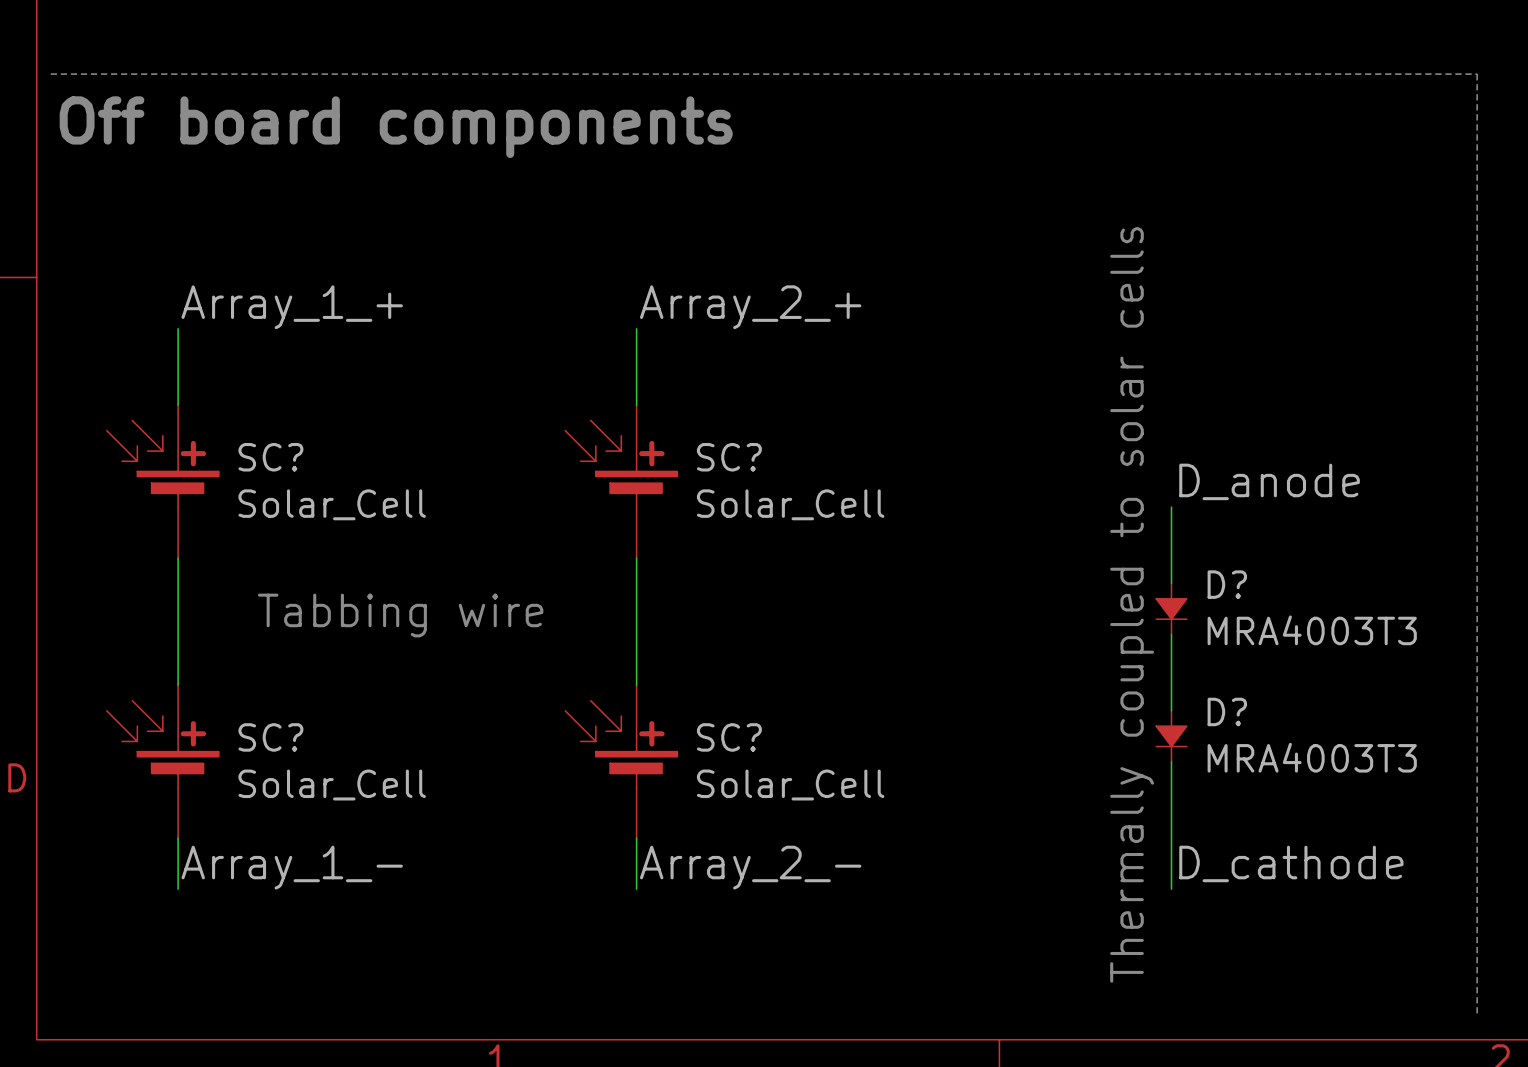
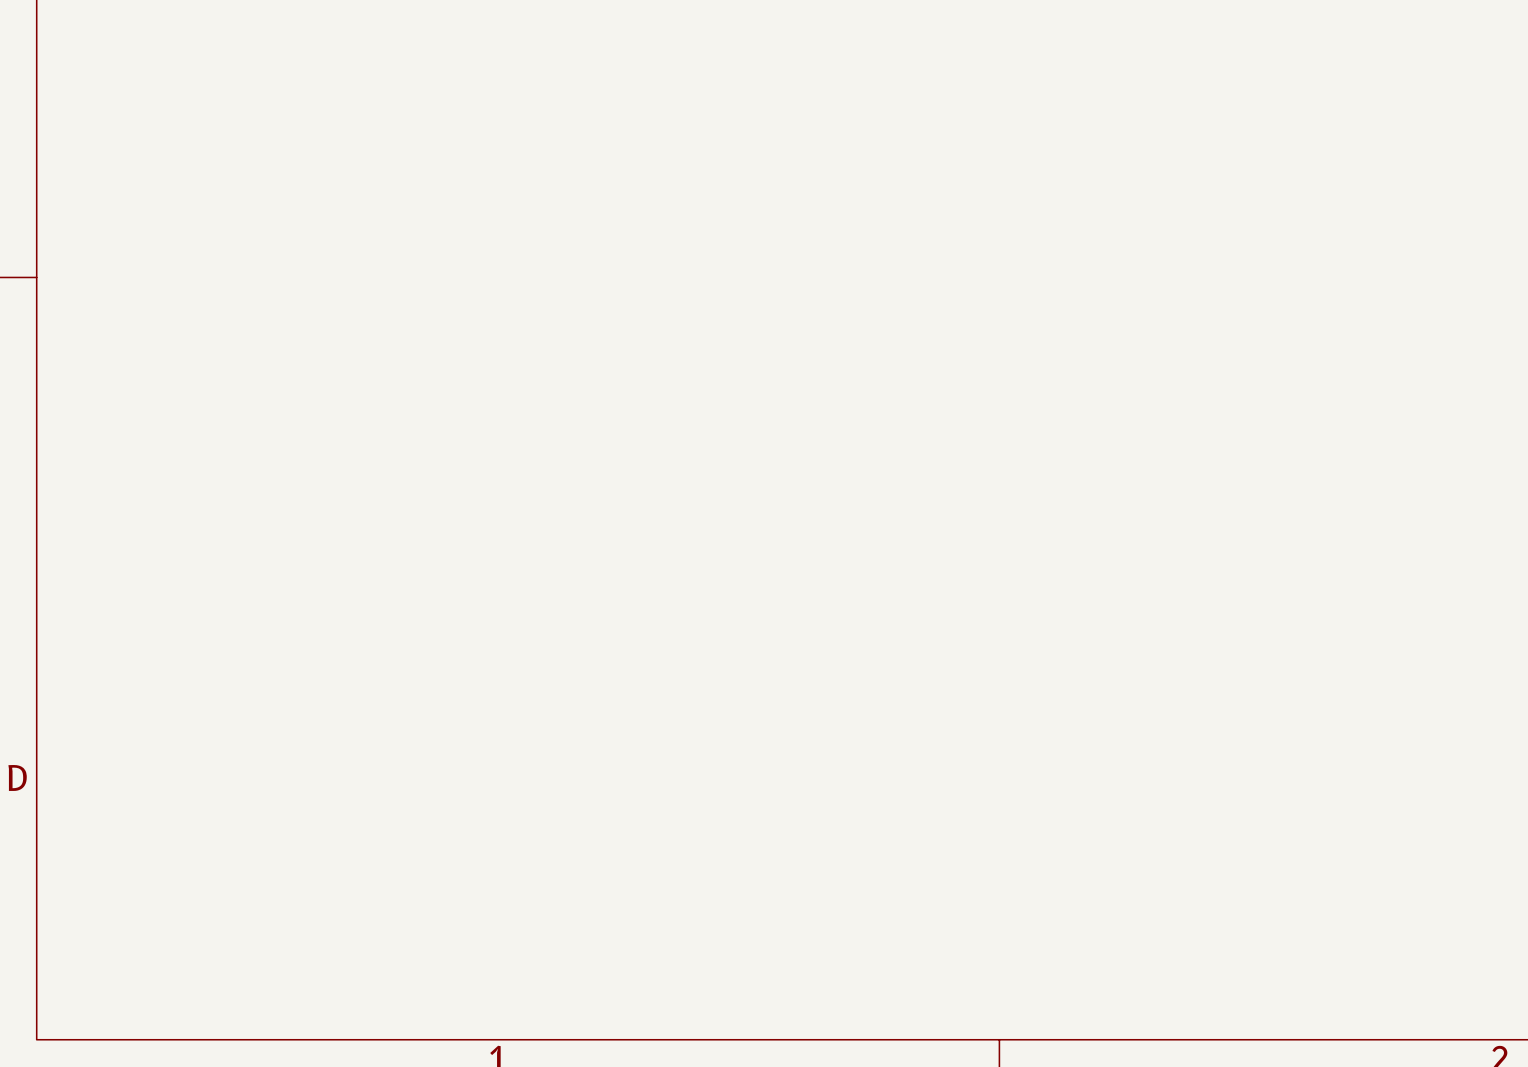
line: (50, 74) (1477, 74) (1477, 1016) -> none
text: Off board components (396, 127) -> none
label: Array_1_+ (292, 307) -> none
label: Array_2_+ (750, 307) -> none
wire: (178, 328) (178, 405) -> none
wire: (636, 328) (636, 405) -> none
SC?: Solar_Cell (162, 481) -> none
SC?: Solar_Cell (621, 481) -> none
label: D_anode (1269, 481) -> none
wire: (1171, 507) (1171, 583) -> none
wire: (178, 558) (178, 685) -> none
wire: (636, 558) (636, 685) -> none
text: Thermally coupled to solar cells (1132, 604) -> none
D?: MRA4003T3 (1171, 609) -> none
text: Tabbing wire (400, 615) -> none
wire: (1171, 634) (1171, 710) -> none
D?: MRA4003T3 (1171, 736) -> none
SC?: Solar_Cell (162, 761) -> none
SC?: Solar_Cell (621, 761) -> none
wire: (1171, 761) (1171, 889) -> none
wire: (178, 838) (178, 889) -> none
wire: (636, 838) (636, 889) -> none
label: D_cathode (1291, 863) -> none
label: Array_1_- (292, 867) -> none
label: Array_2_- (750, 867) -> none

